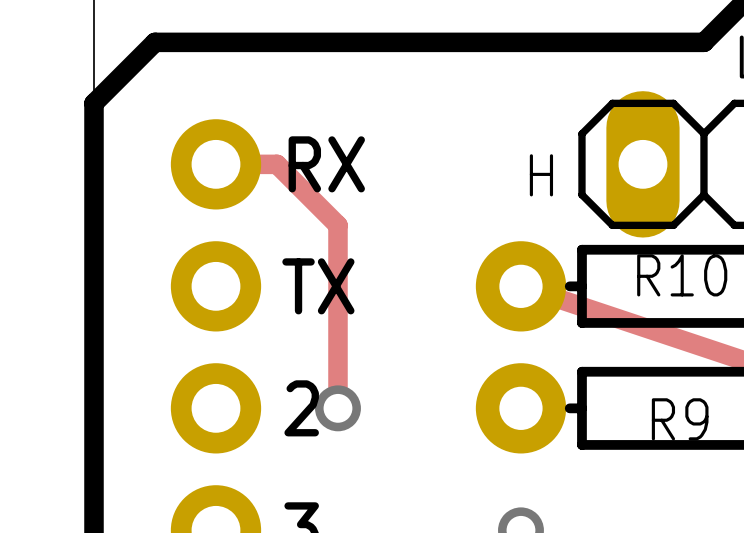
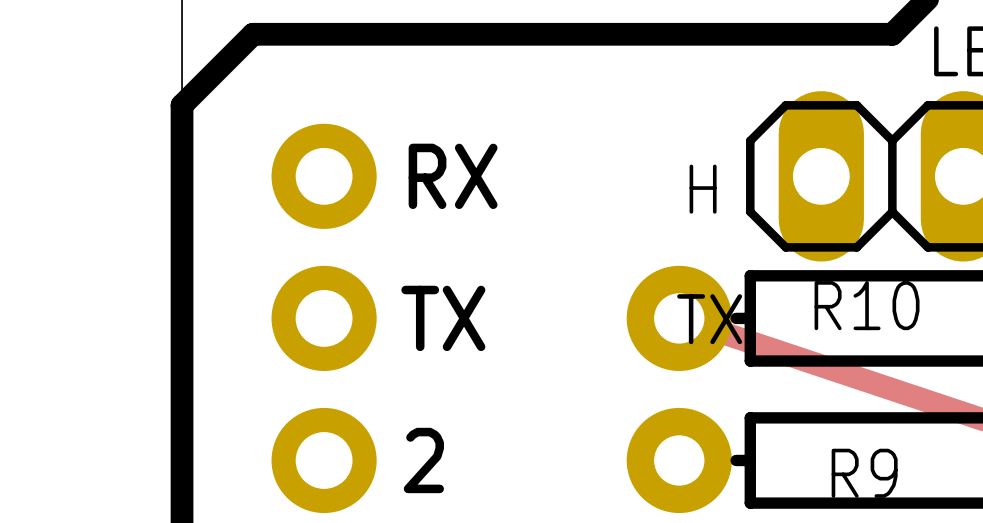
track: (215, 164) (276, 164) (337, 225) (337, 408) -> none
text: none -> TX (709, 319)
via: (337, 408) -> none

